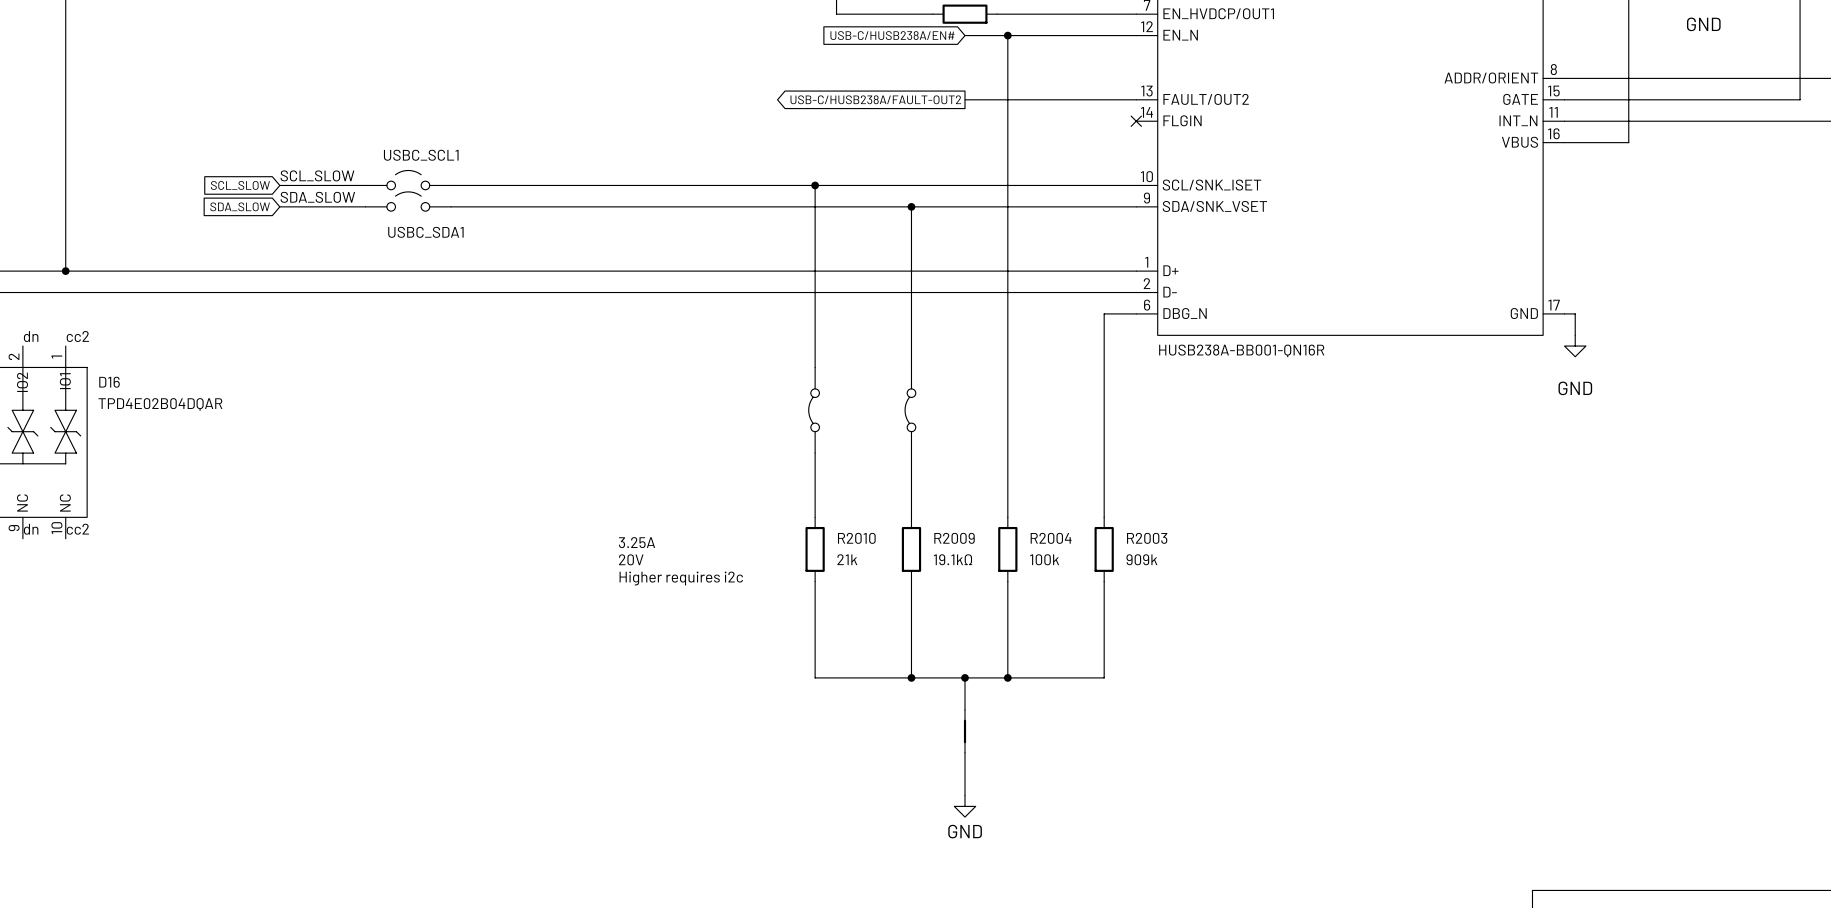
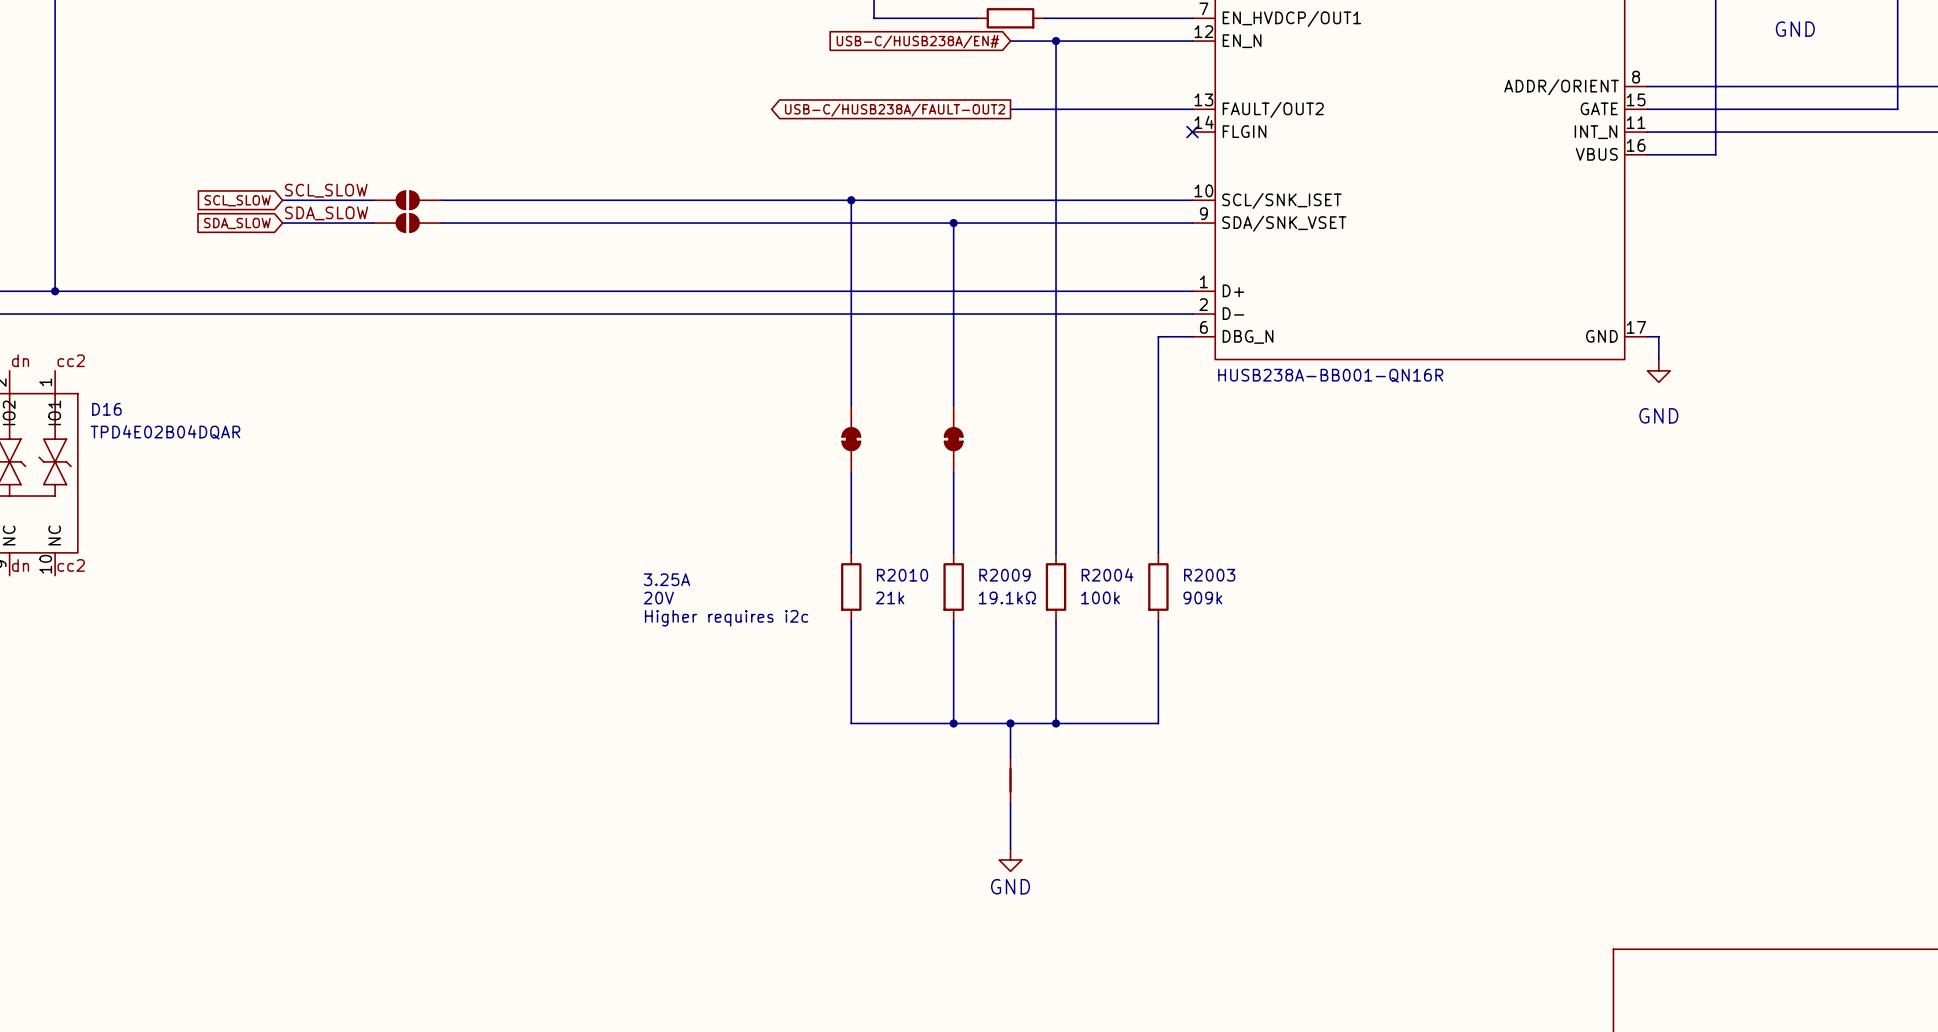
USBC_SCL1: (408, 180) -> none
part: none -> (407, 200)
USBC_SDA1: (408, 201) -> none
part: none -> (407, 223)
part symbol: [808, 367, 820, 454] -> [842, 405, 861, 474]
part symbol: [905, 367, 916, 454] -> [944, 405, 963, 474]

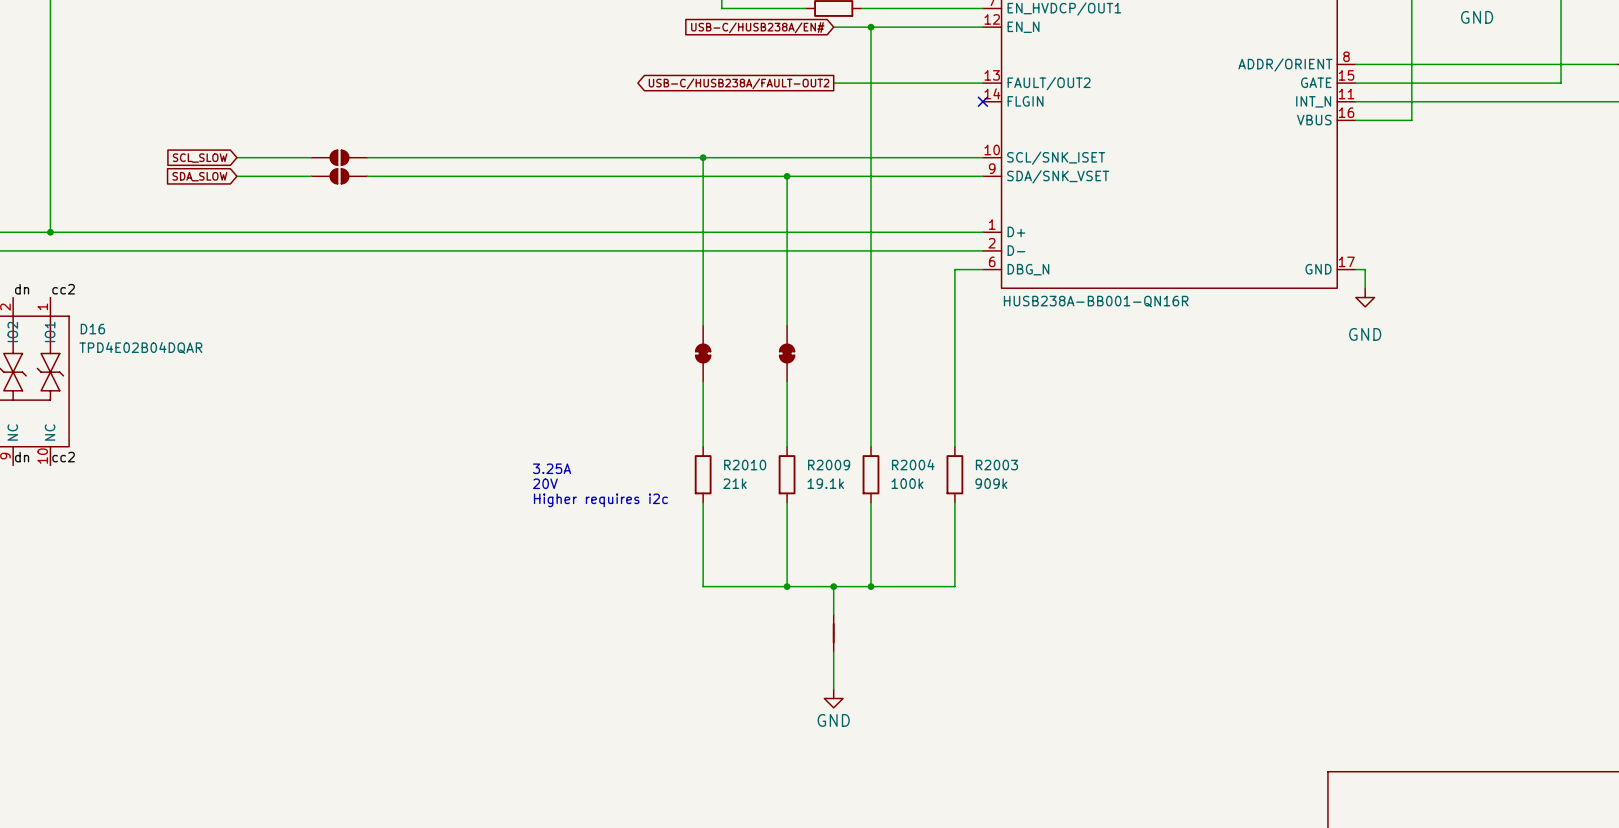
label: SCL_SLOW (326, 190) -> none
label: SDA_SLOW (326, 213) -> none
R2009 value: 19.1kΩ (1007, 597) -> 19.1k (825, 483)

